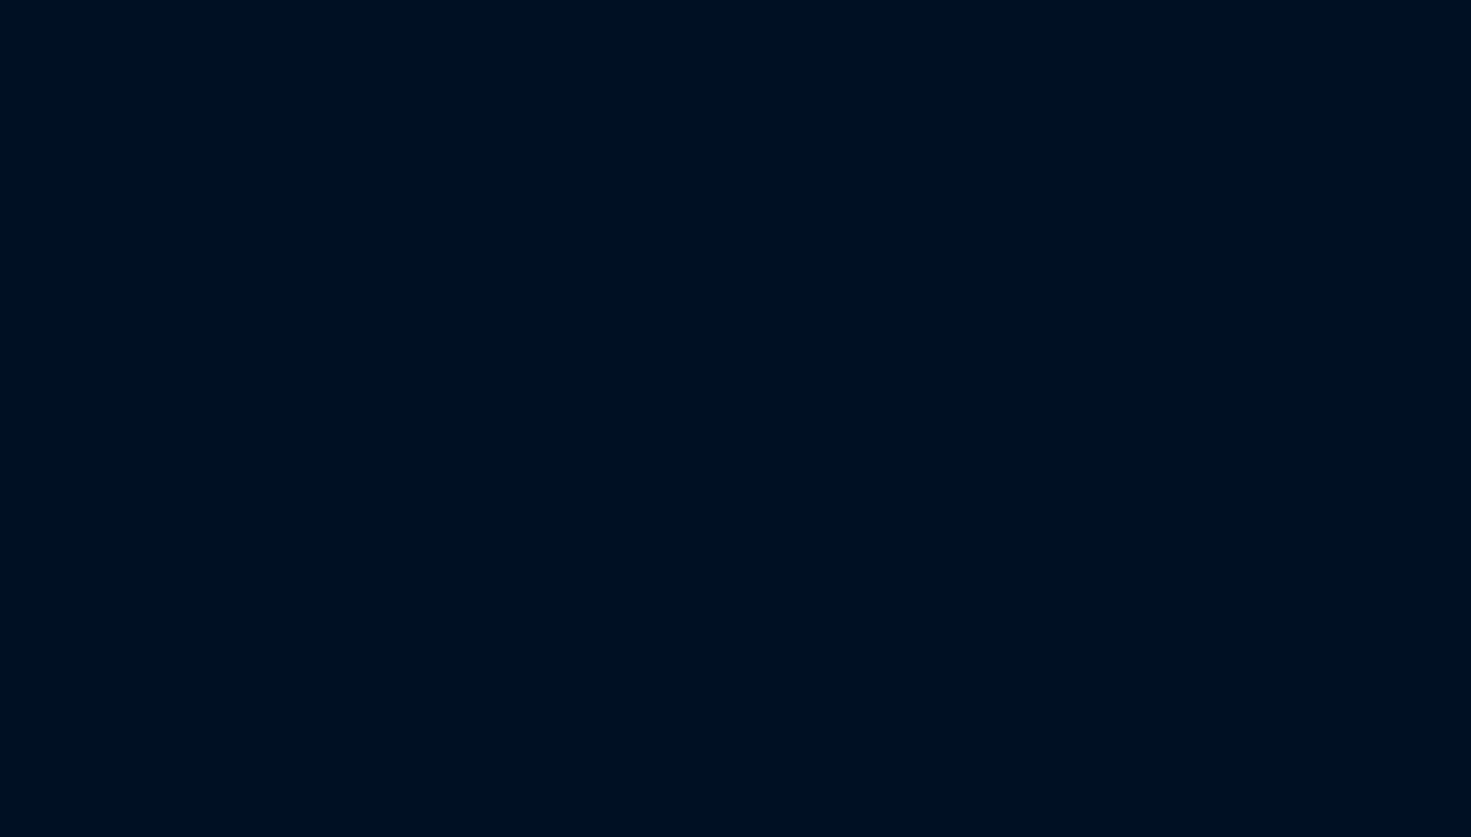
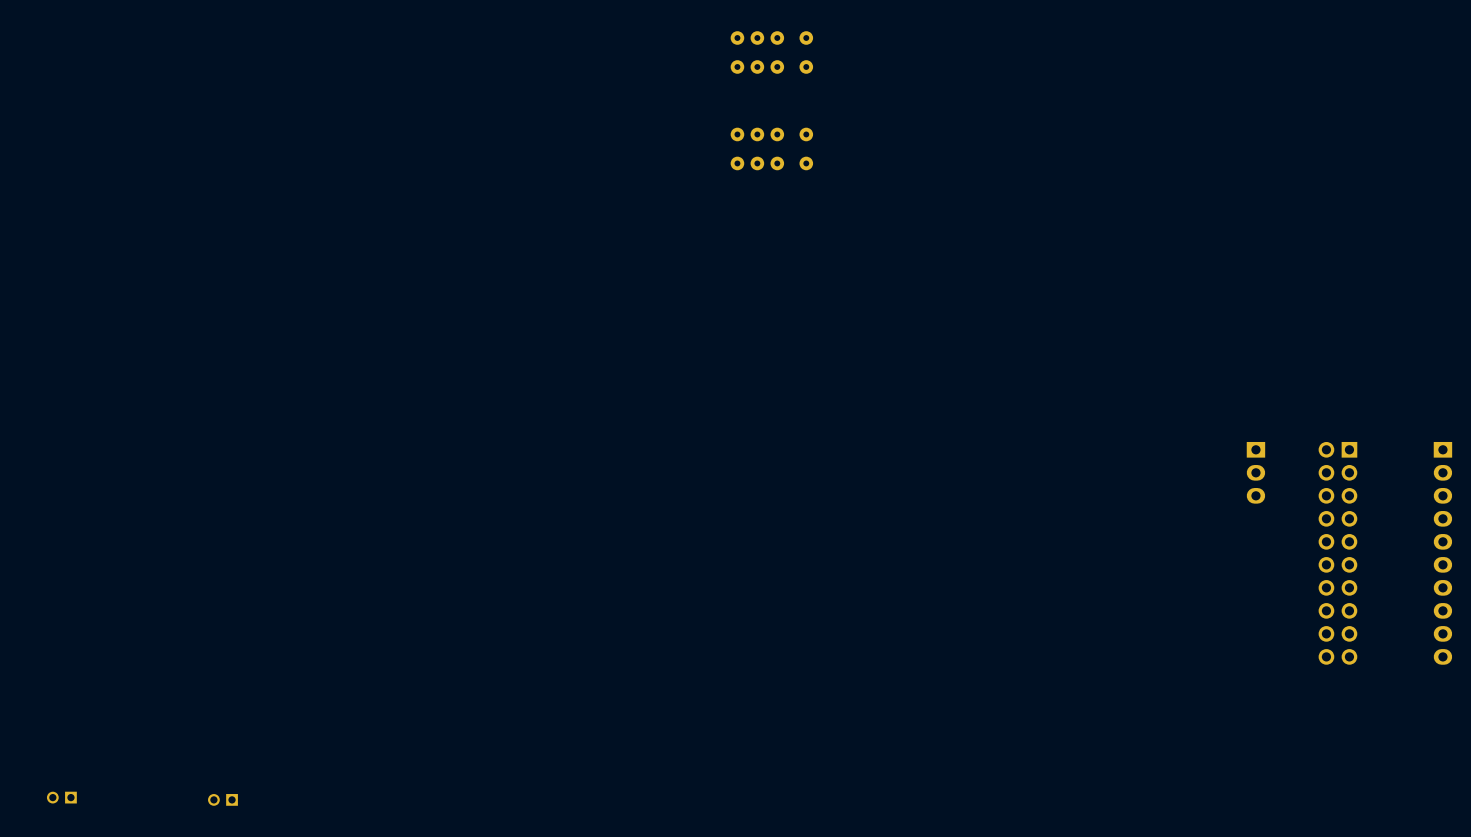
part: none -> (771, 52)
part: none -> (771, 148)
part: none -> (1255, 472)
part: none -> (1337, 553)
part: none -> (1442, 553)
part: none -> (61, 797)
part: none -> (222, 799)

